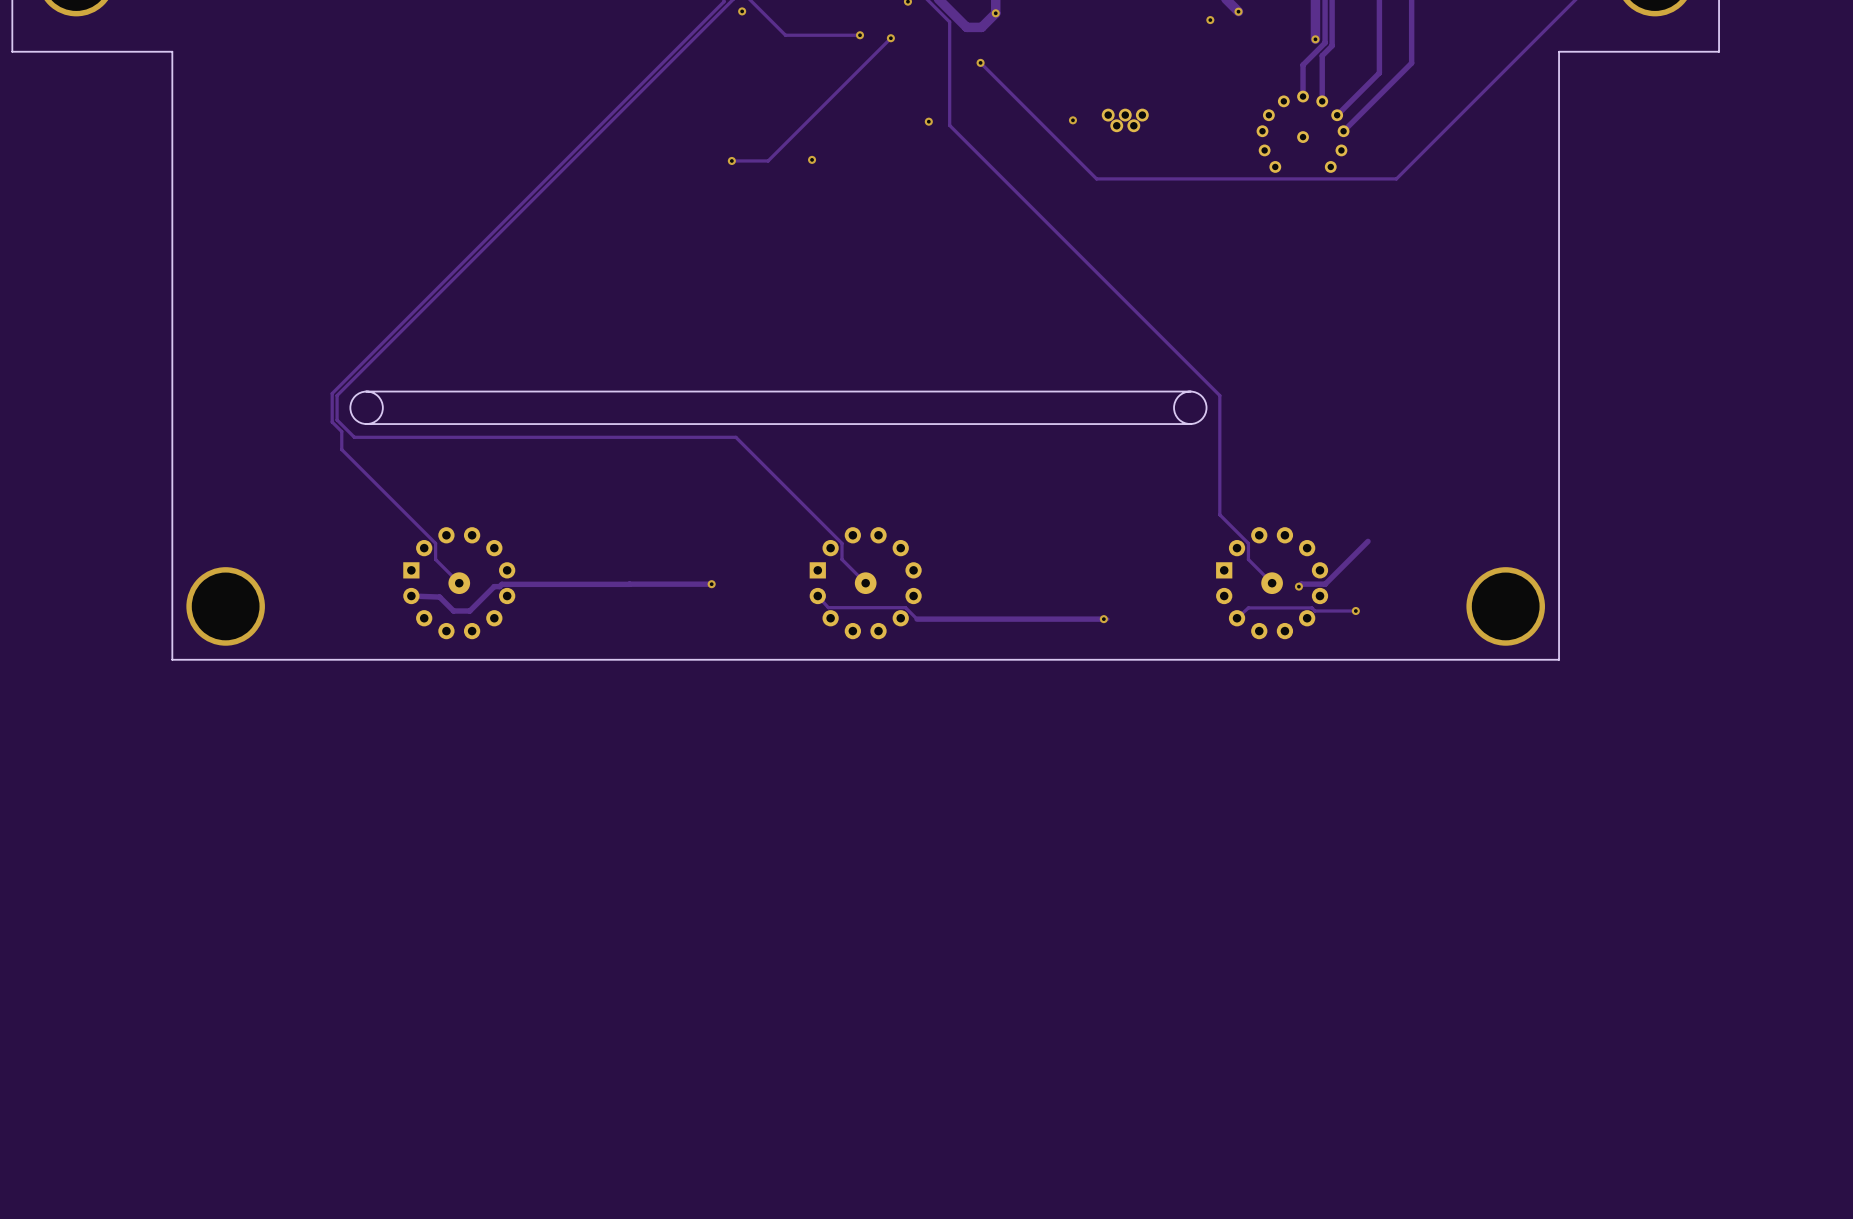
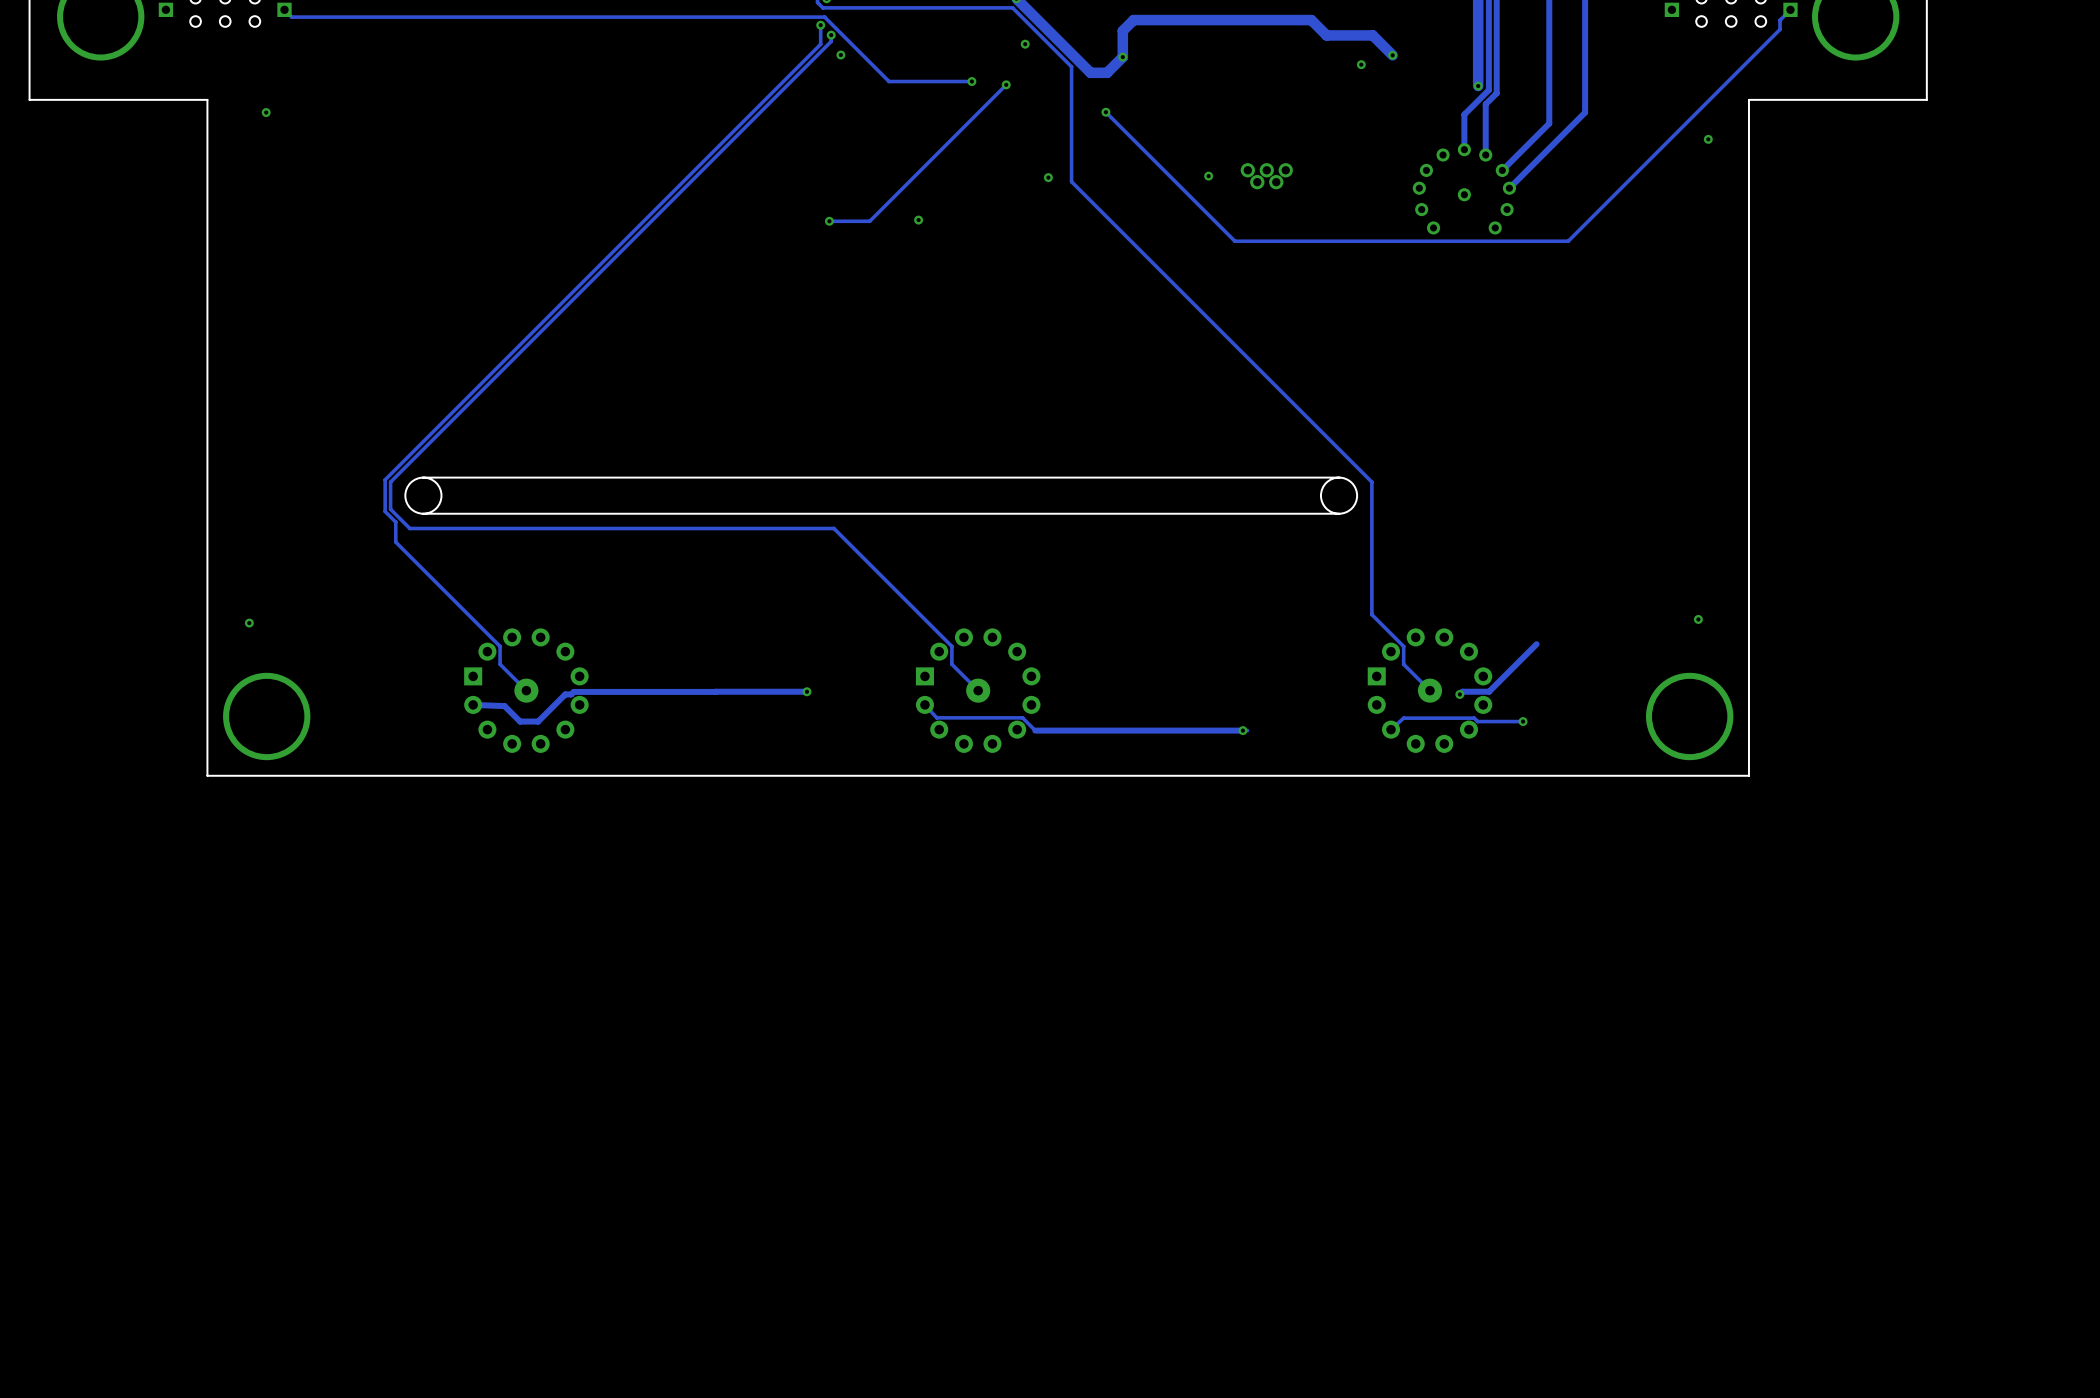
via: none -> (266, 112)
via: none -> (1708, 139)
via: none -> (1698, 619)
via: none -> (249, 623)

